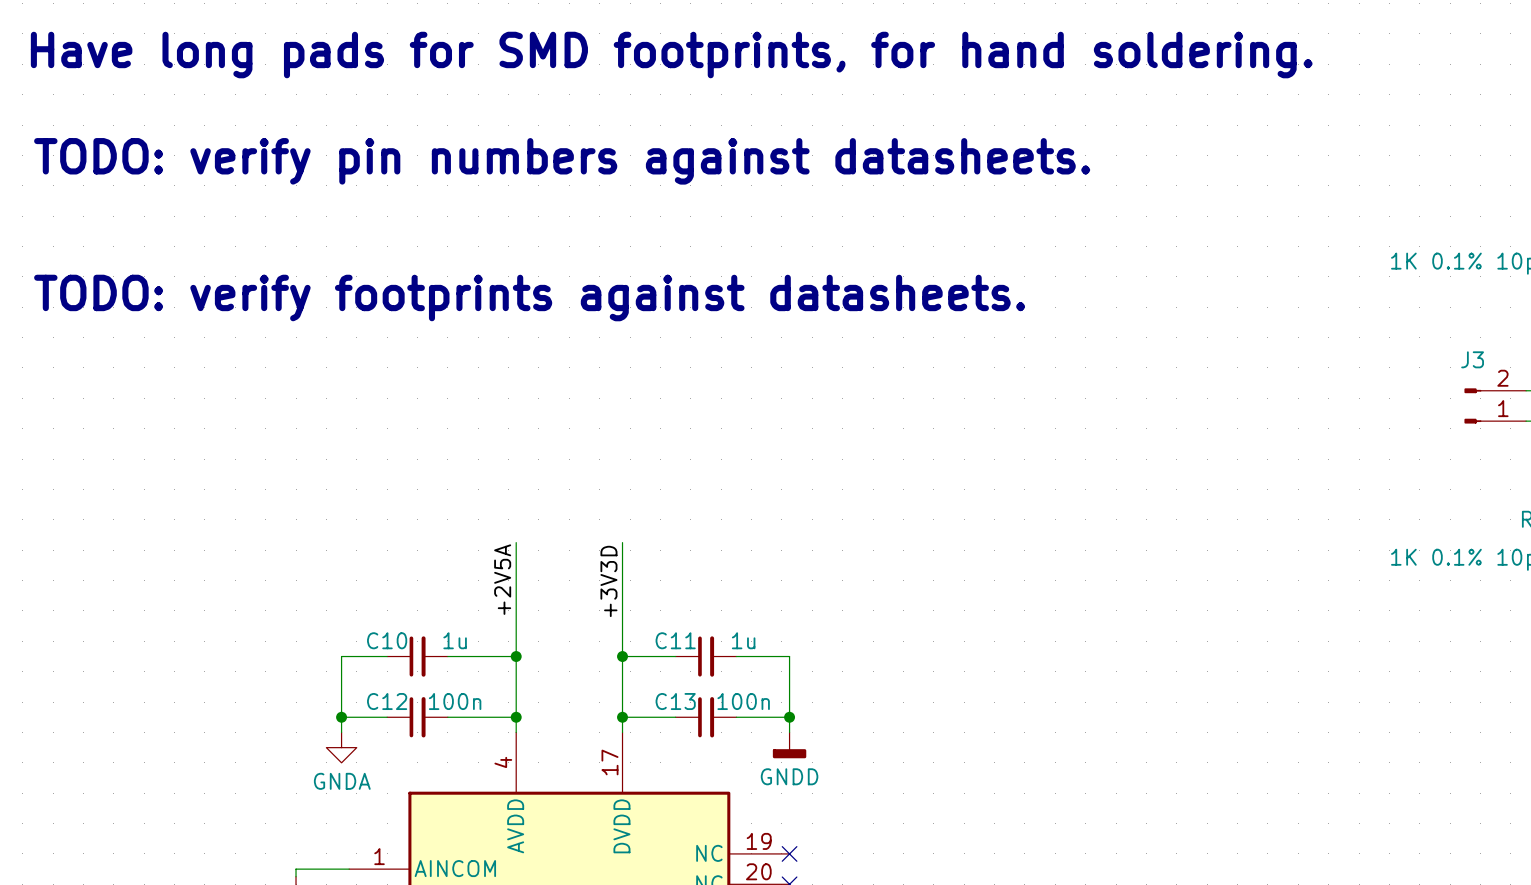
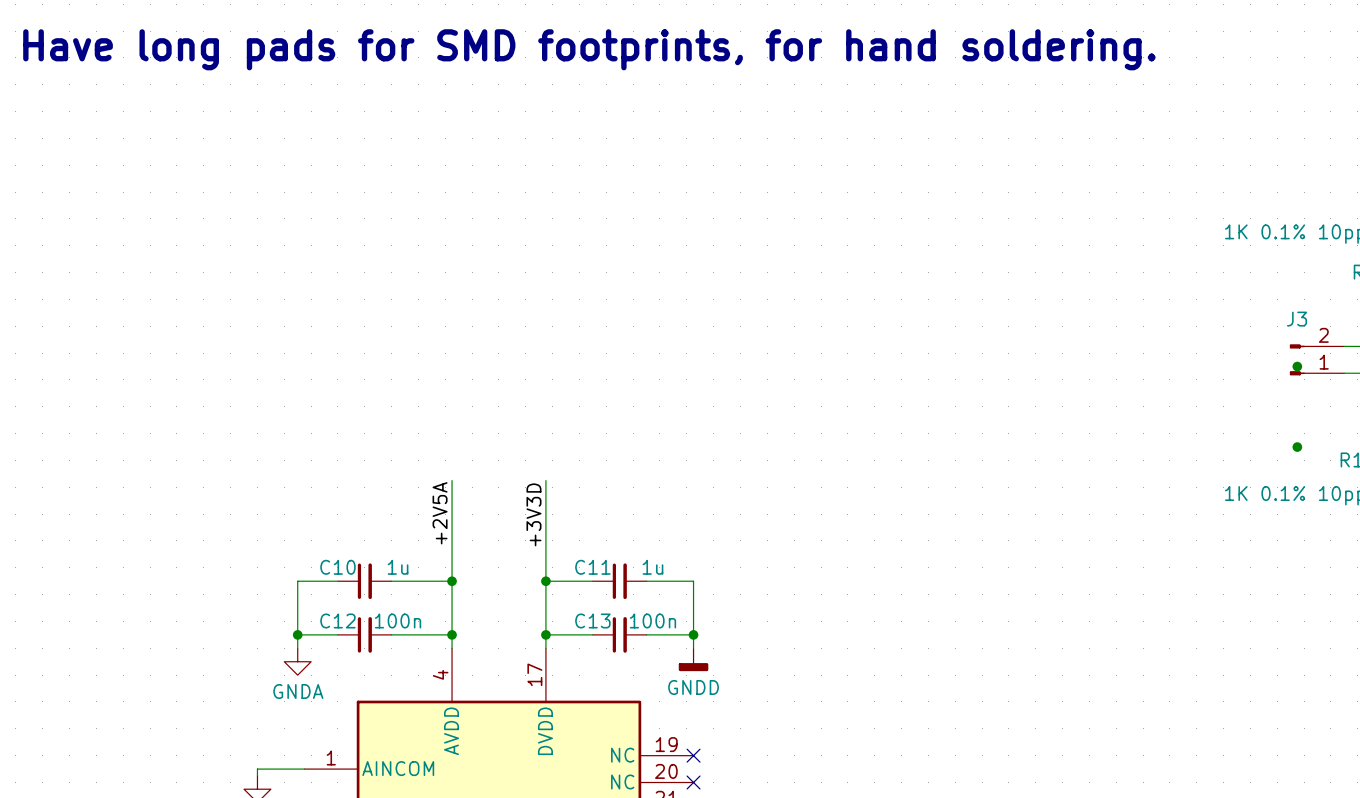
text: TODO: verify pin numbers against datasheets. (562, 161) -> none
text: TODO: verify footprints against datasheets. (529, 298) -> none
junction: none -> (1297, 366)
junction: none -> (1297, 447)

